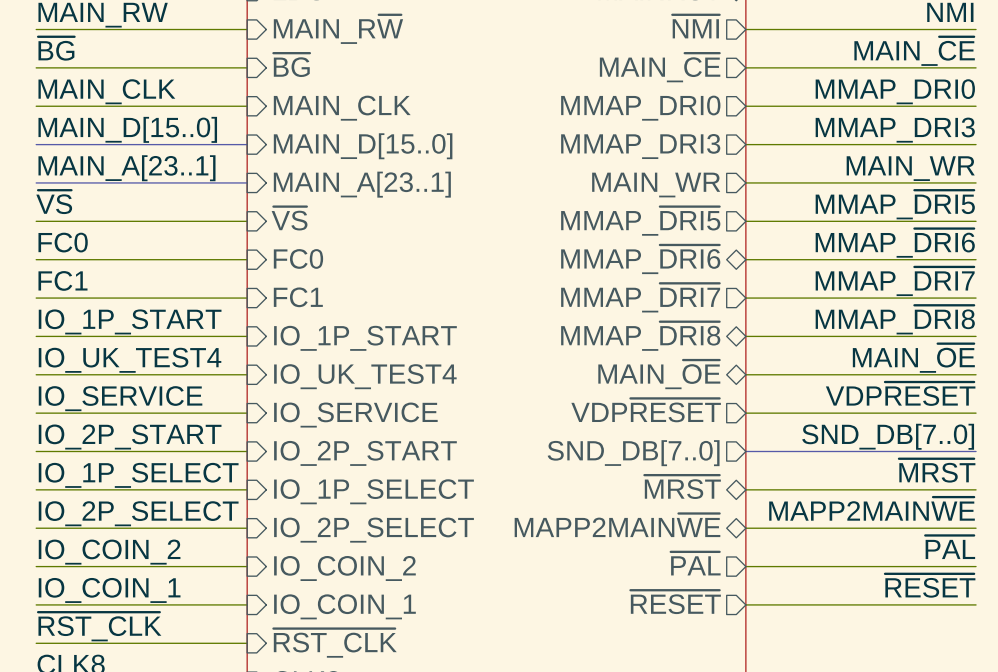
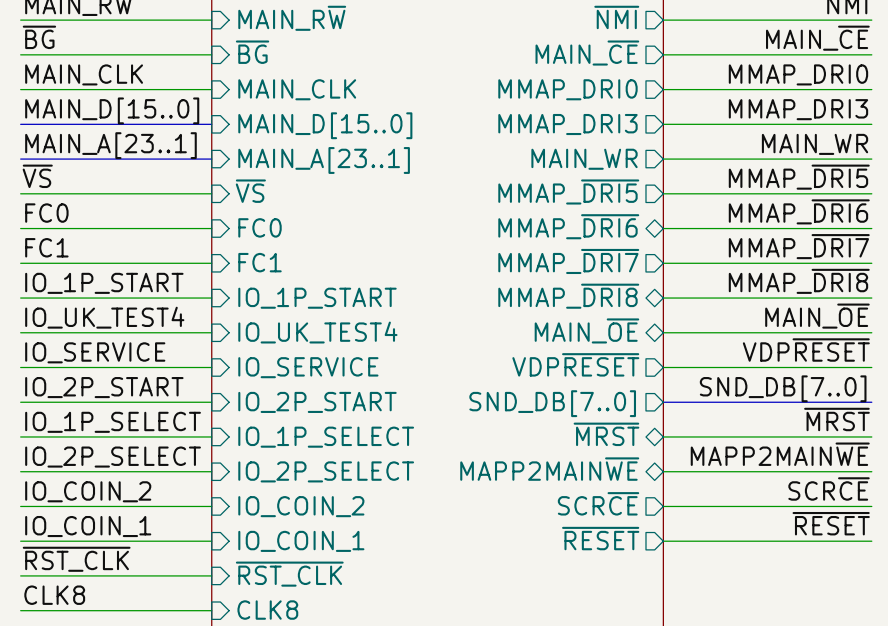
label: ~{PAL} (950, 547) -> SCR~{CE} (829, 488)
sheet pin: ~{PAL} (695, 563) -> SCR~{CE} (598, 503)

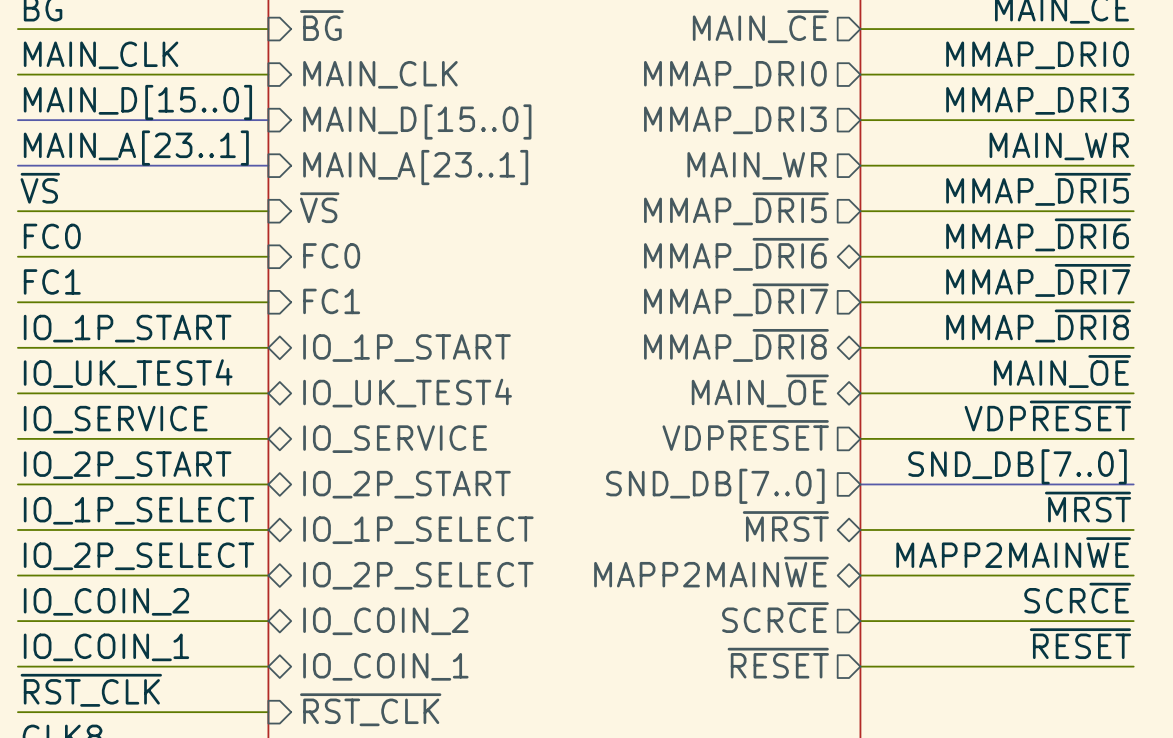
sheet pin shape: input (317, 298) -> bidirectional (407, 348)
sheet pin shape: input (317, 332) -> bidirectional (407, 393)
sheet pin shape: input (308, 367) -> bidirectional (395, 439)
sheet pin shape: input (317, 402) -> bidirectional (407, 484)
sheet pin shape: input (326, 437) -> bidirectional (418, 530)
sheet pin shape: input (326, 471) -> bidirectional (418, 575)
sheet pin shape: input (301, 506) -> bidirectional (385, 621)
sheet pin shape: input (301, 541) -> bidirectional (385, 666)

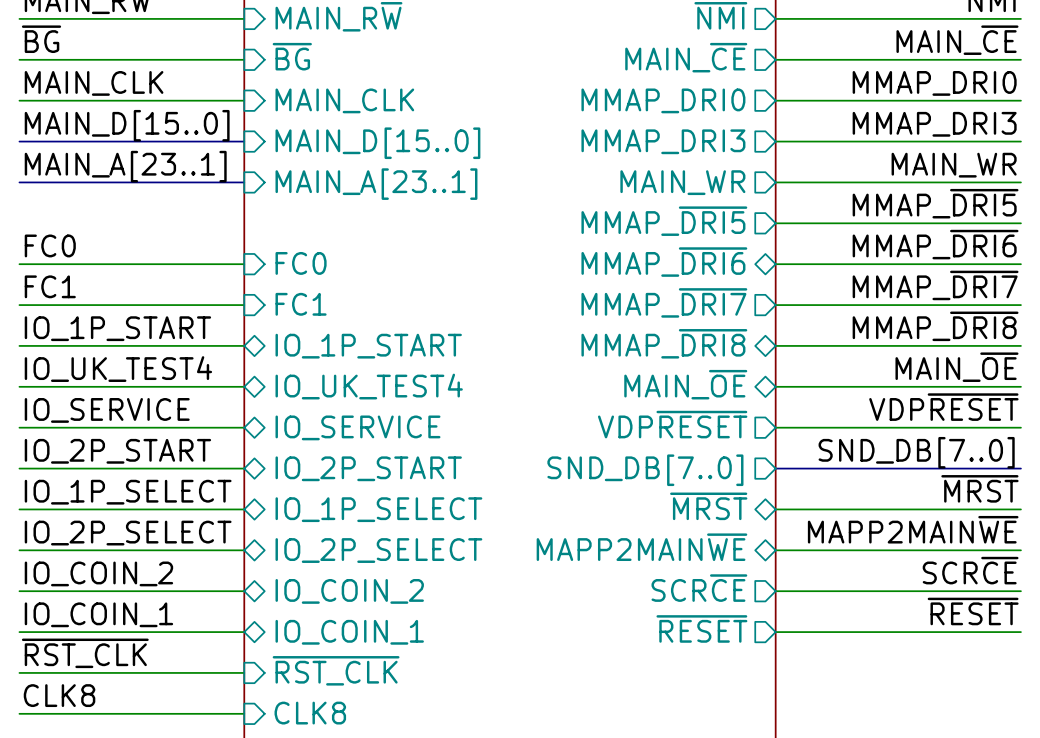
label: ~{VS} (40, 188) -> none
sheet pin: ~{VS} (319, 207) -> none
wire: (17, 211) (268, 211) -> none

